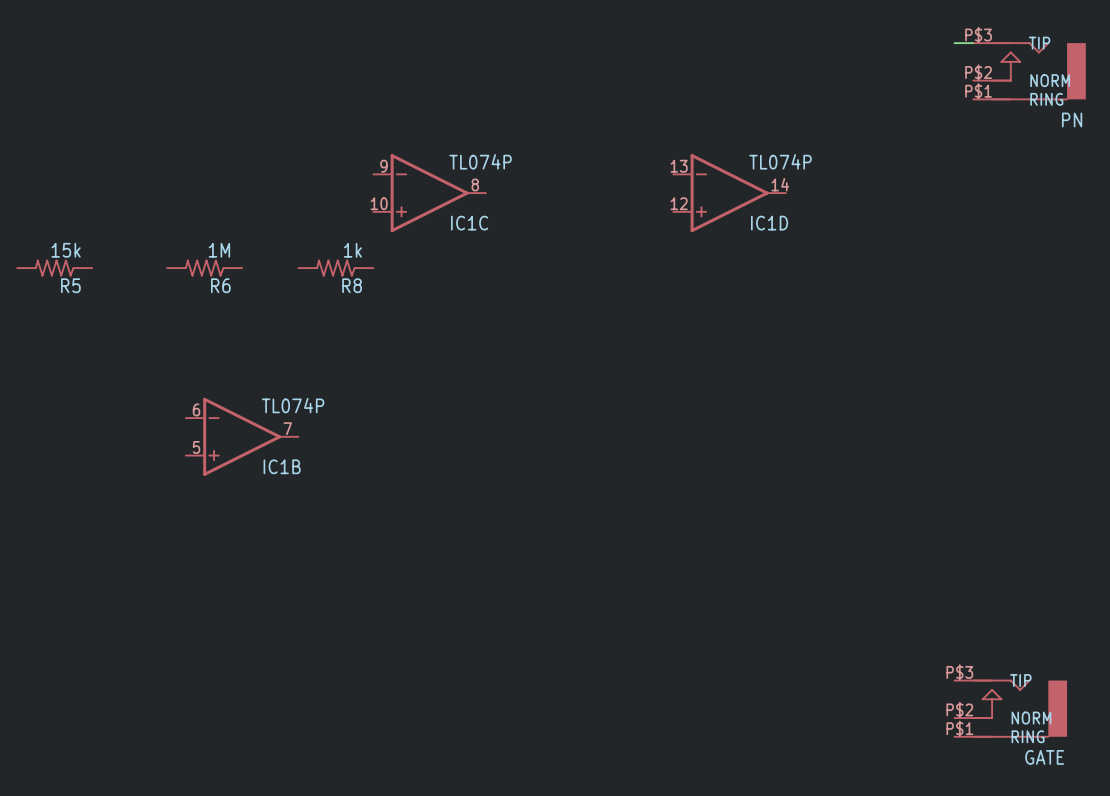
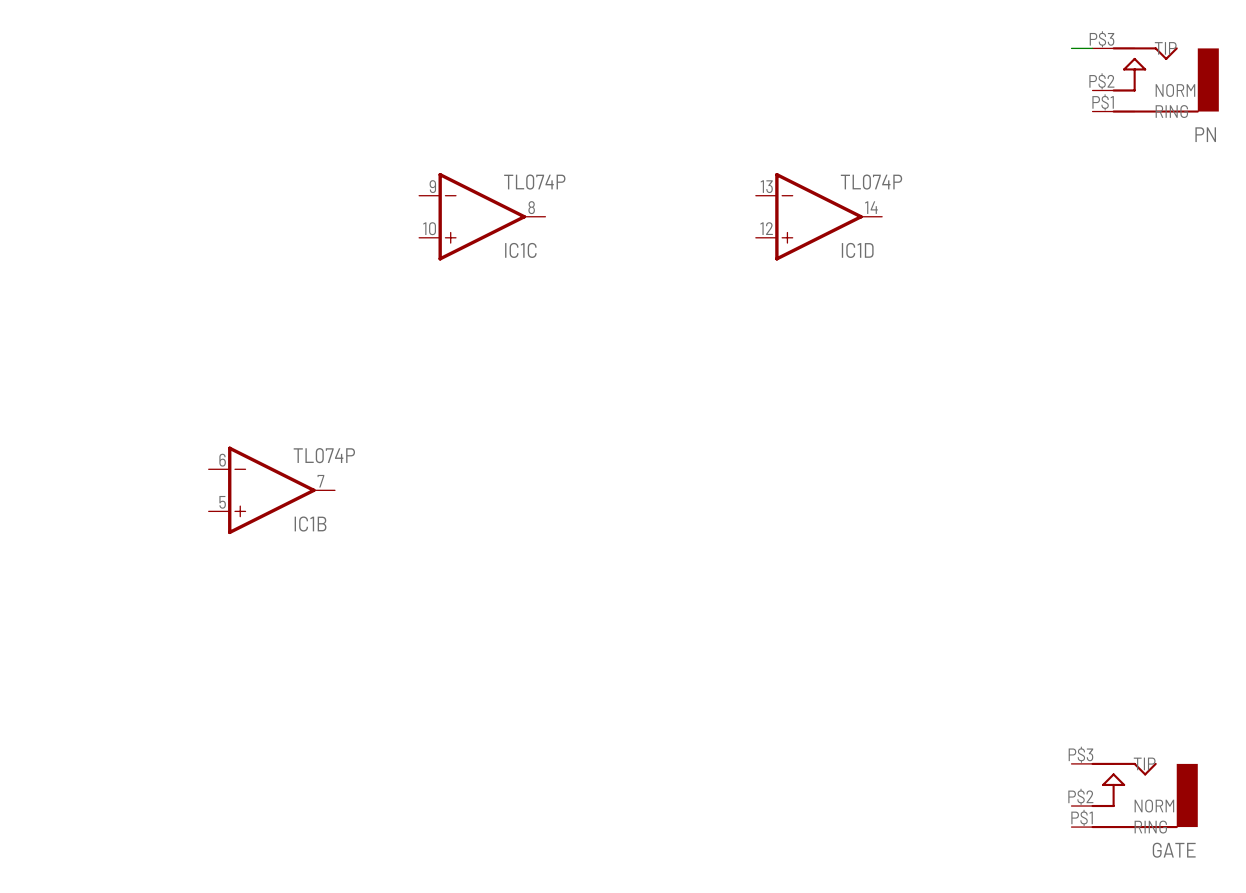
R5: 15k (54, 268) -> none
R6: 1M (204, 268) -> none
R8: 1k (335, 268) -> none

